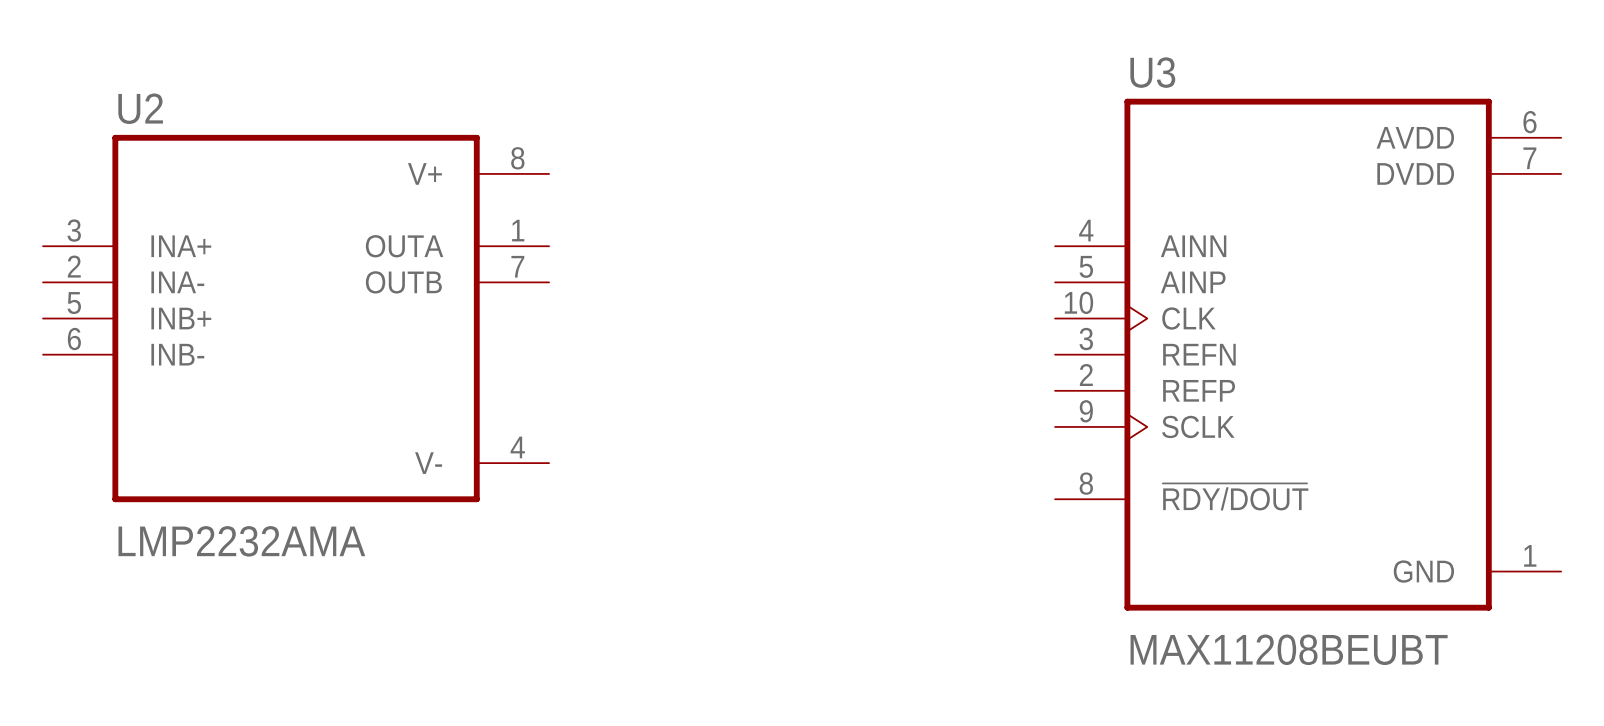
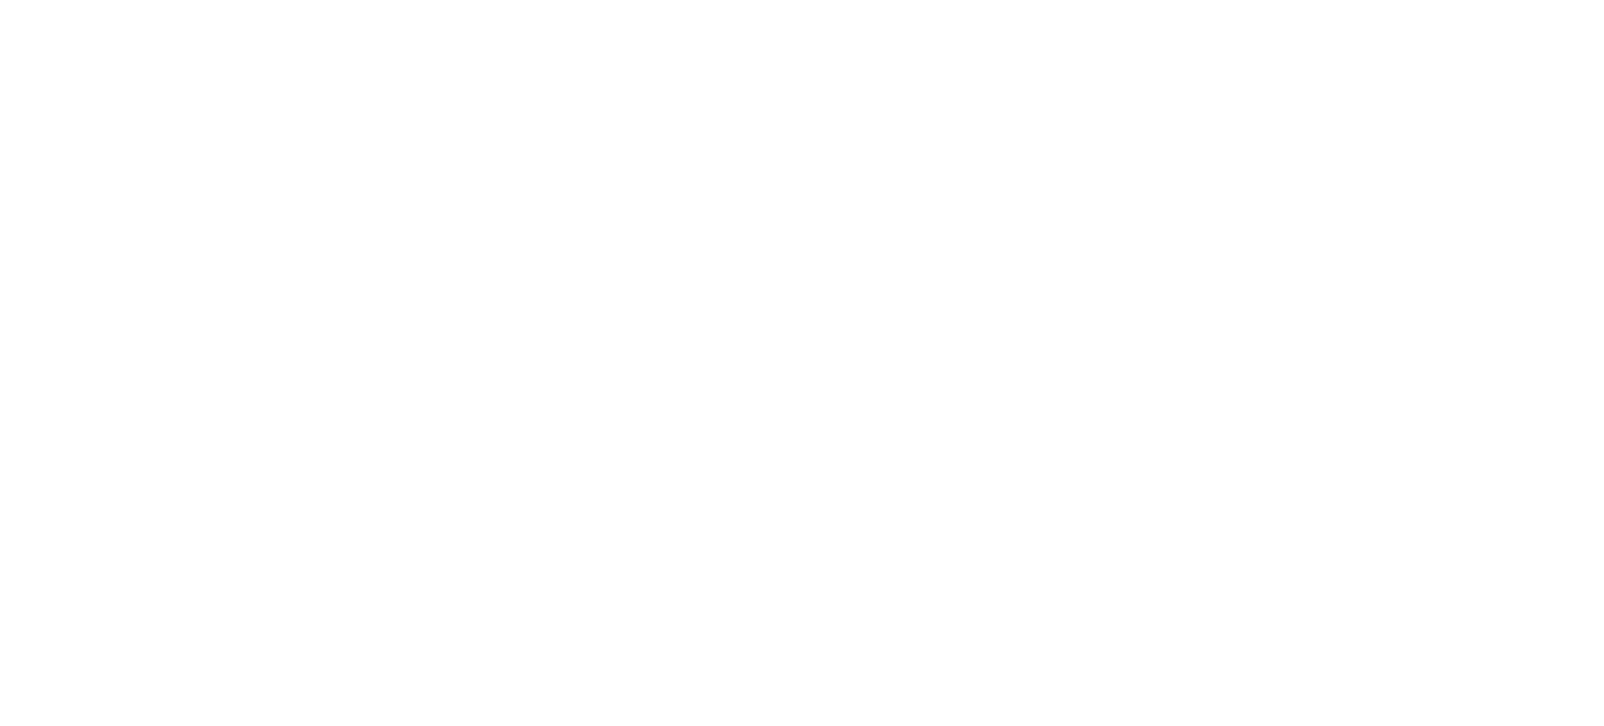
U2: LMP2232AMA (296, 318) -> none
U3: MAX11208BEUBT (1308, 354) -> none

